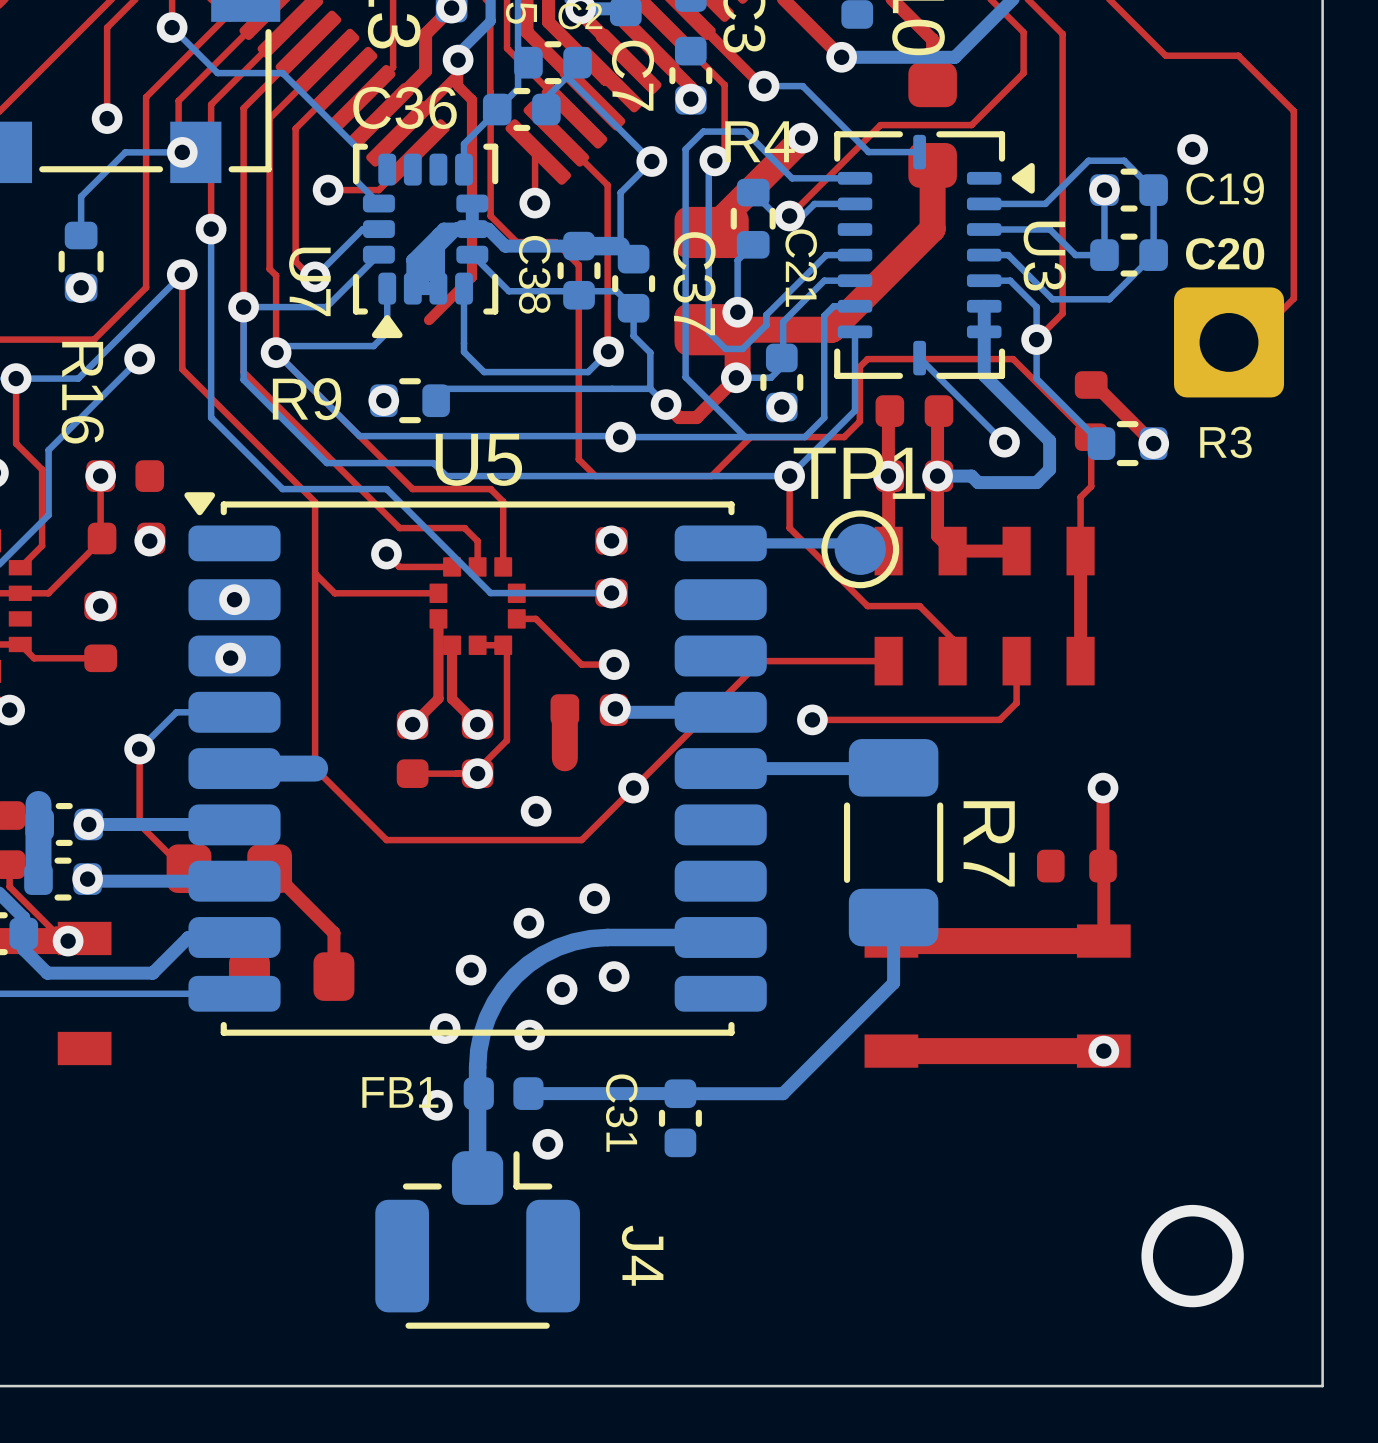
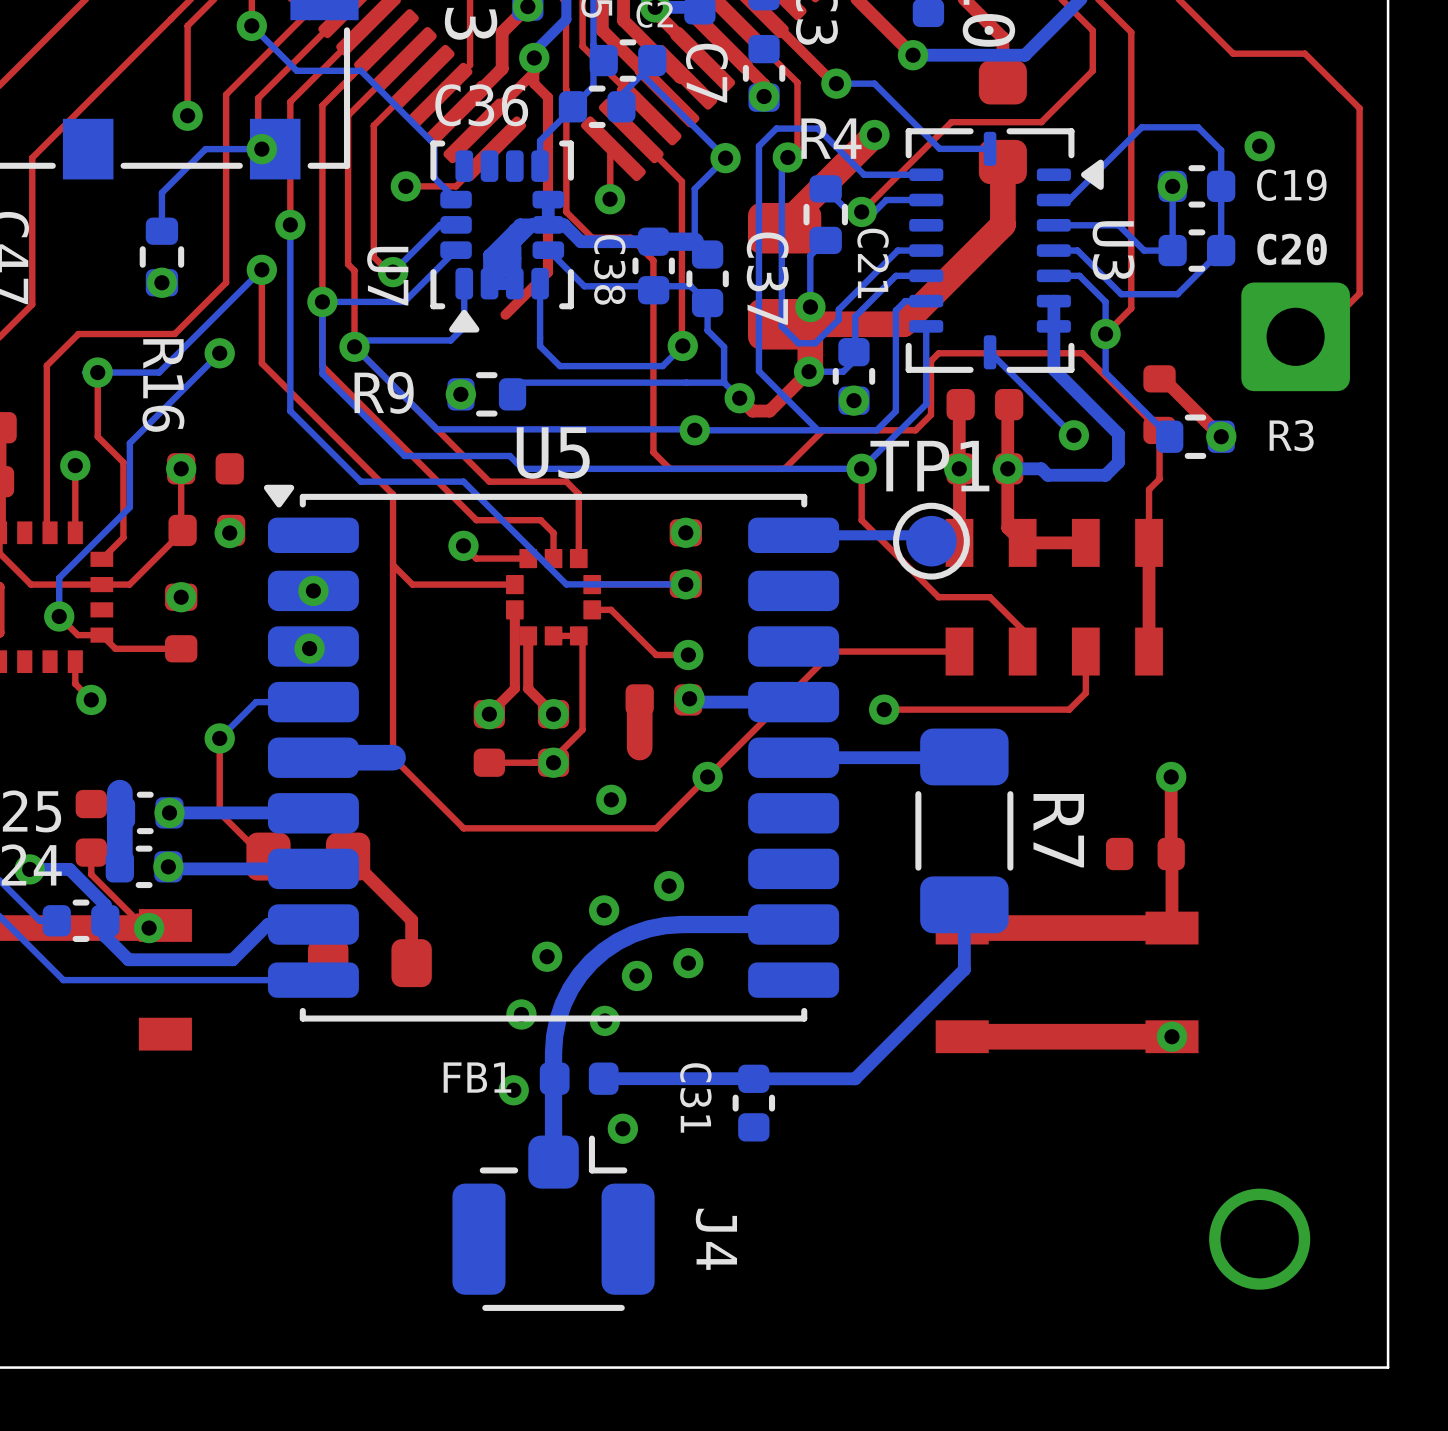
bottom track: (1153, 190) (1124, 160) (1088, 160) (1045, 203) (999, 203) -> (1221, 186) (1221, 150) (1198, 127) (1141, 127) (1069, 200)

